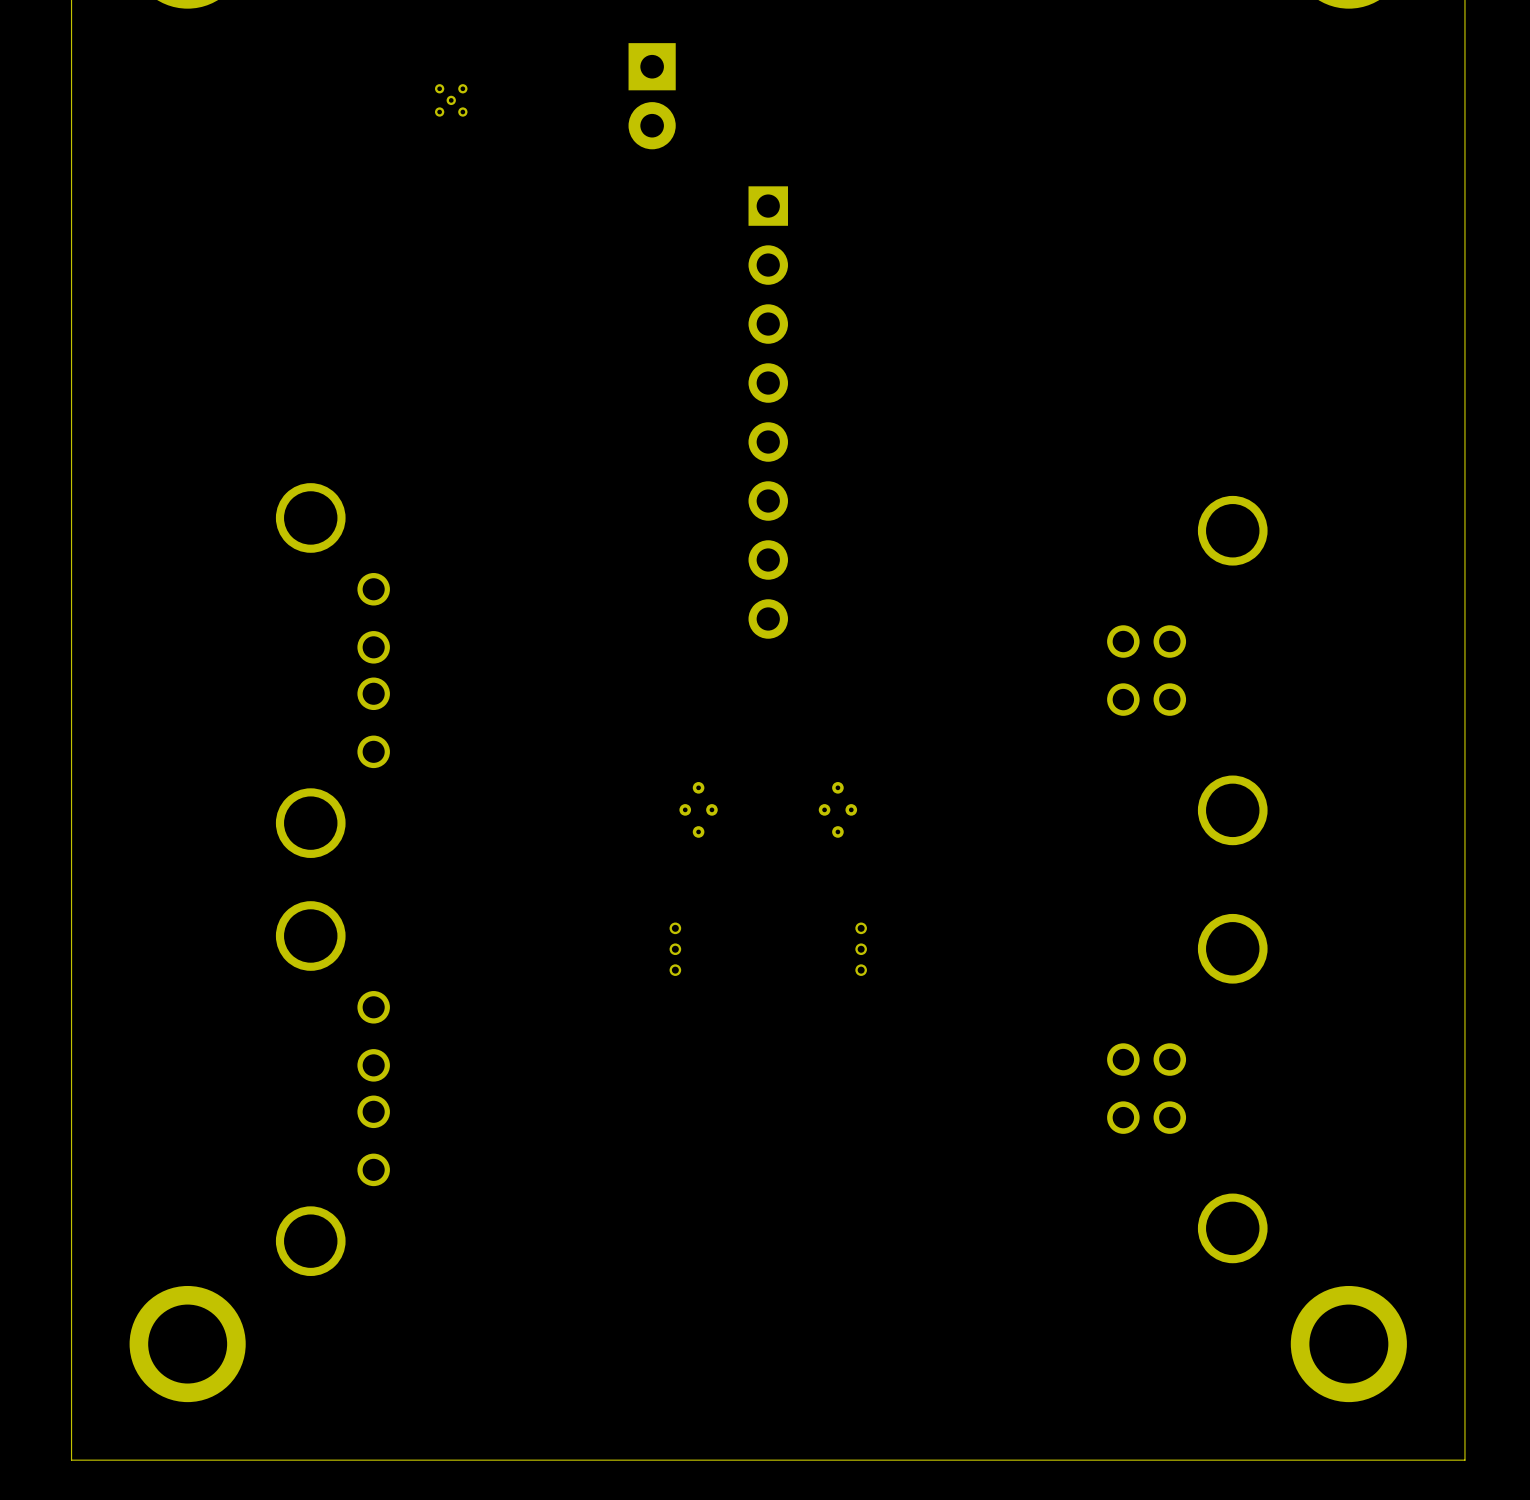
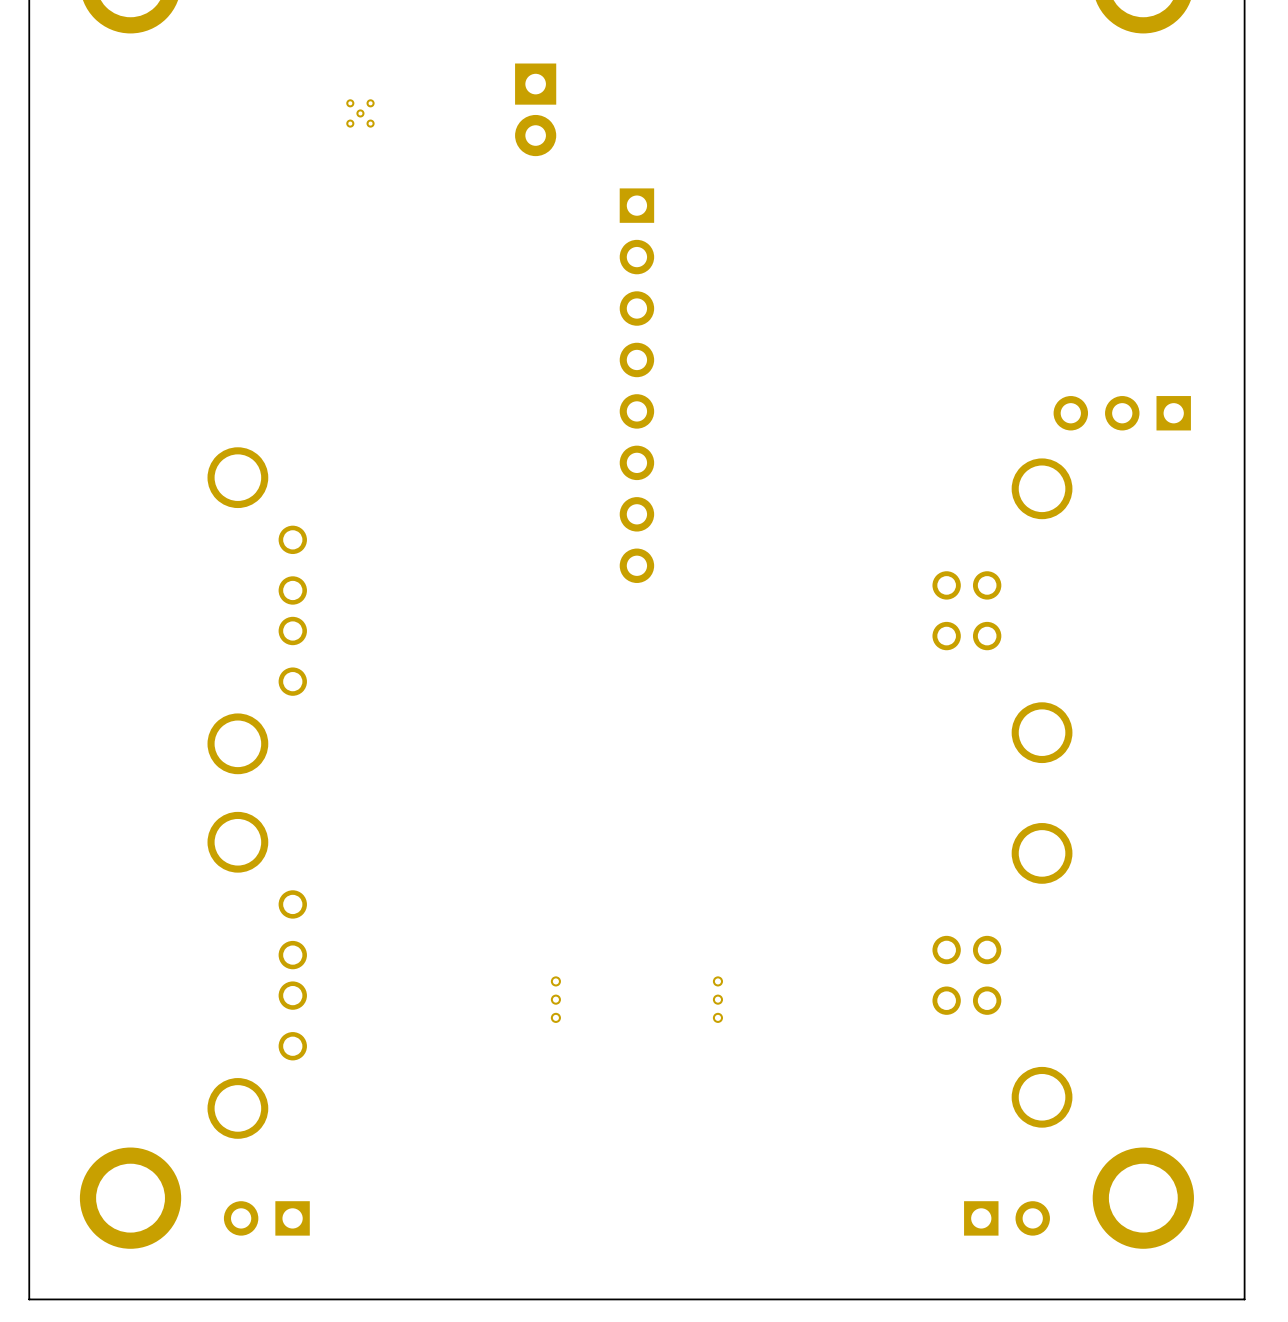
part: none -> (1122, 413)
part: (698, 809) -> none
part: (837, 809) -> none
part: (675, 949) -> none
part: (861, 949) -> none
part: none -> (555, 999)
part: none -> (717, 999)
part: none -> (266, 1218)
part: none -> (1007, 1218)

